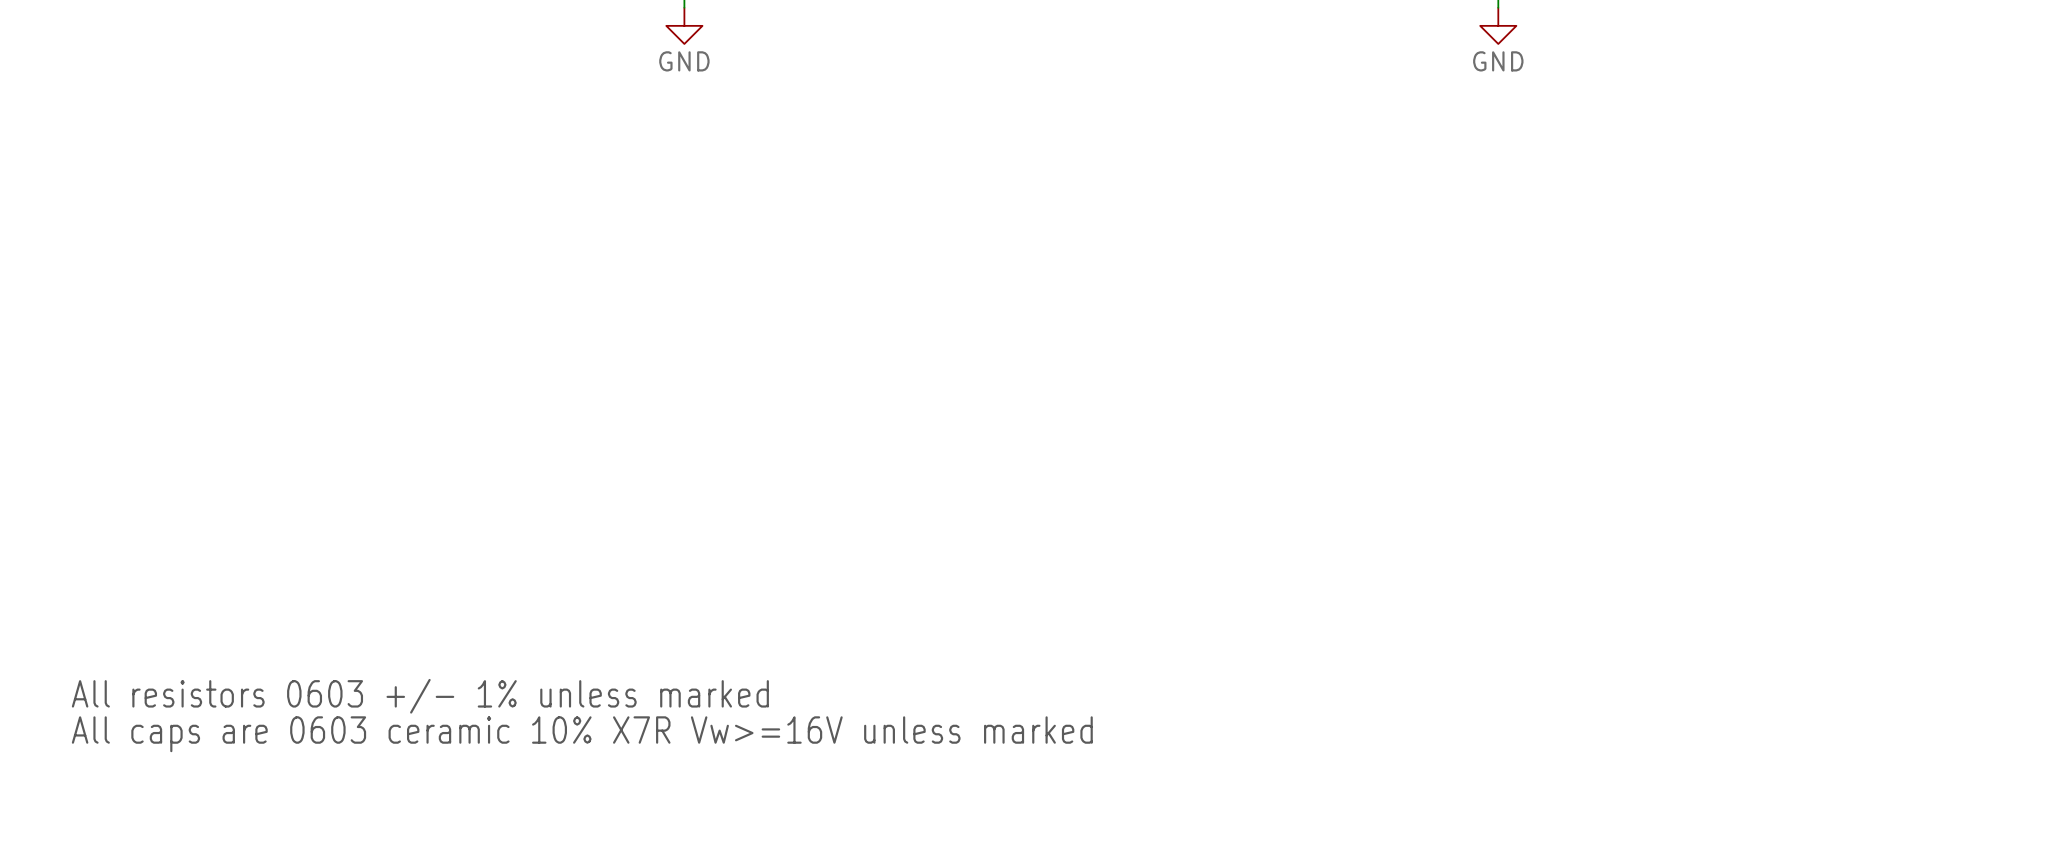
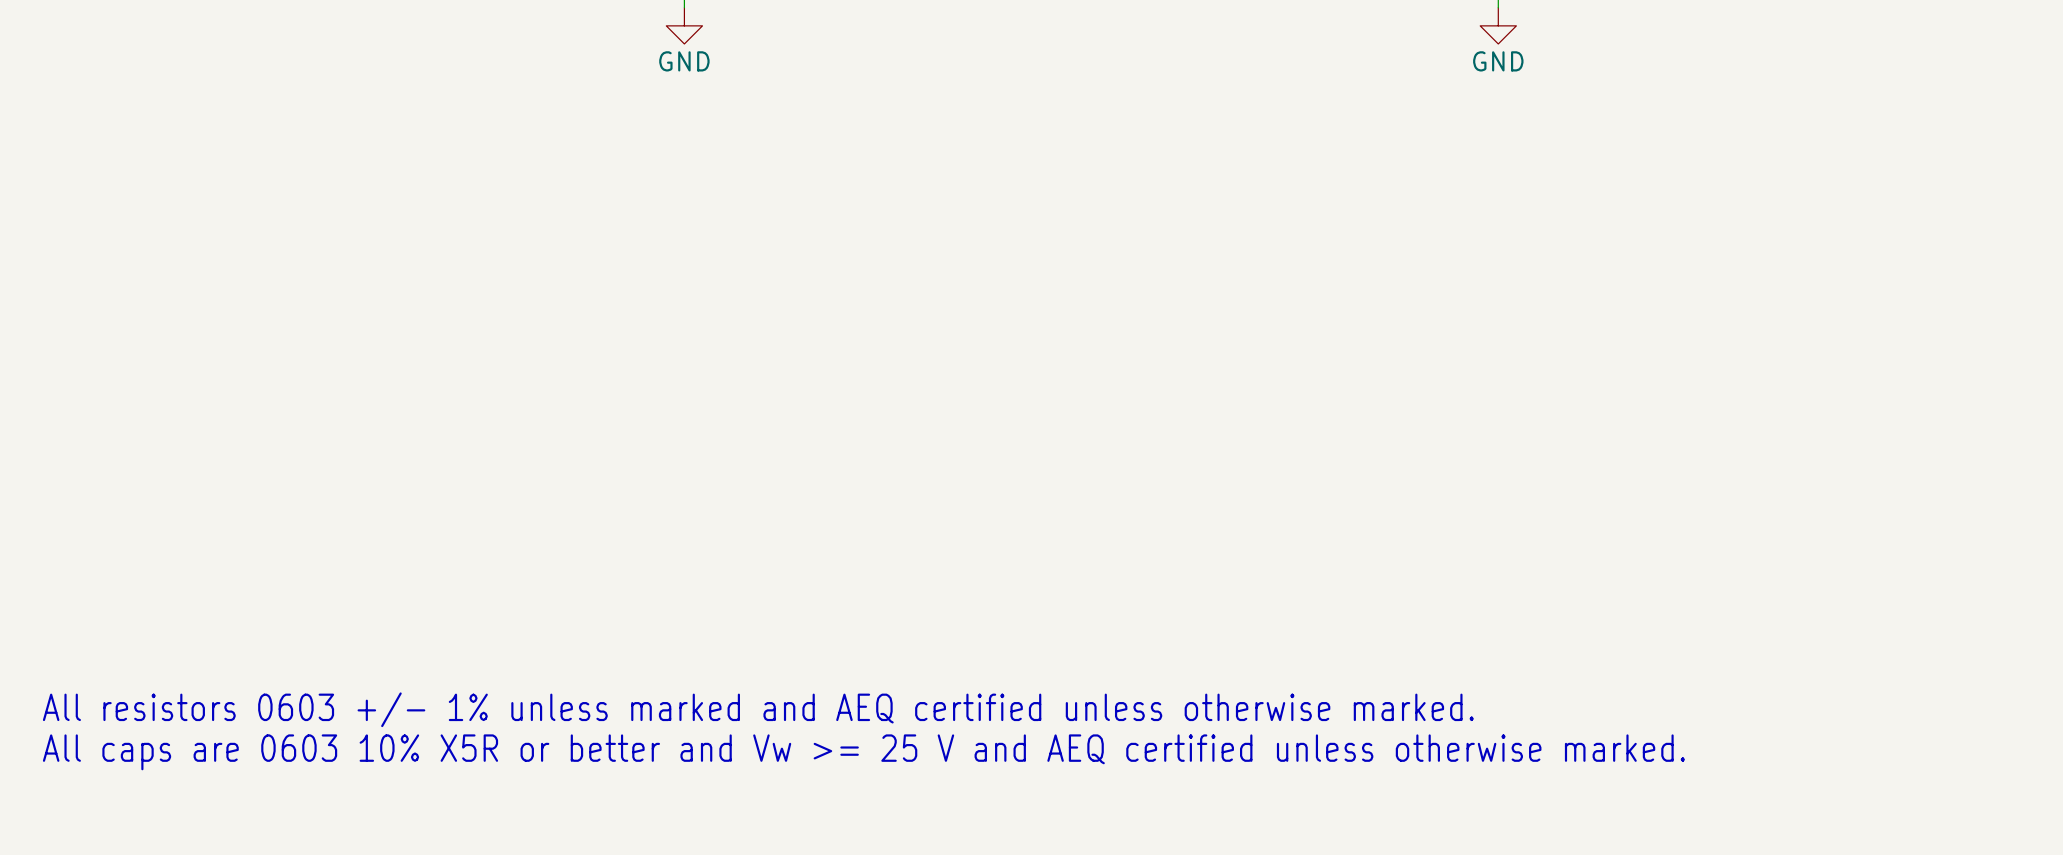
text: All resistors 0603 +/- 1% unless marked (420, 696) -> All resistors 0603 +/- 1% unless marked and AEQ certified unless otherwise marked. (758, 709)
text: All caps are 0603 ceramic 10% X7R Vw>=16V unless marked (582, 734) -> none
text: none -> All caps are 0603 10% X5R or better and Vw >= 25 V and AEQ certified unless otherwise marked. (863, 752)

